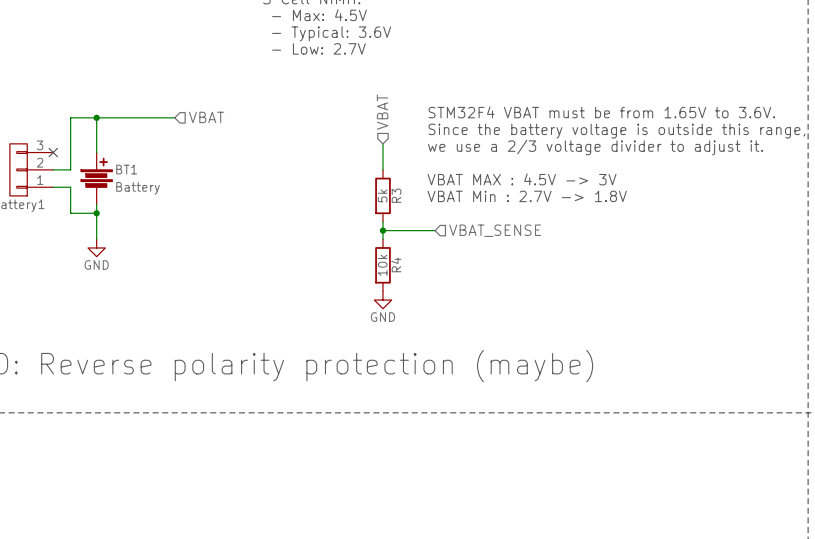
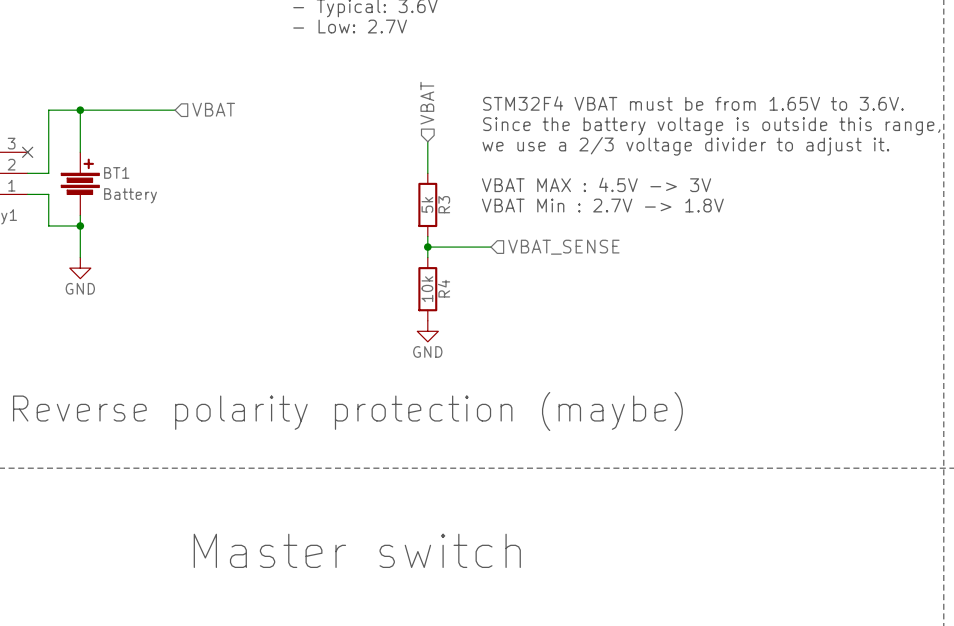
text: none -> Master switch (357, 550)

